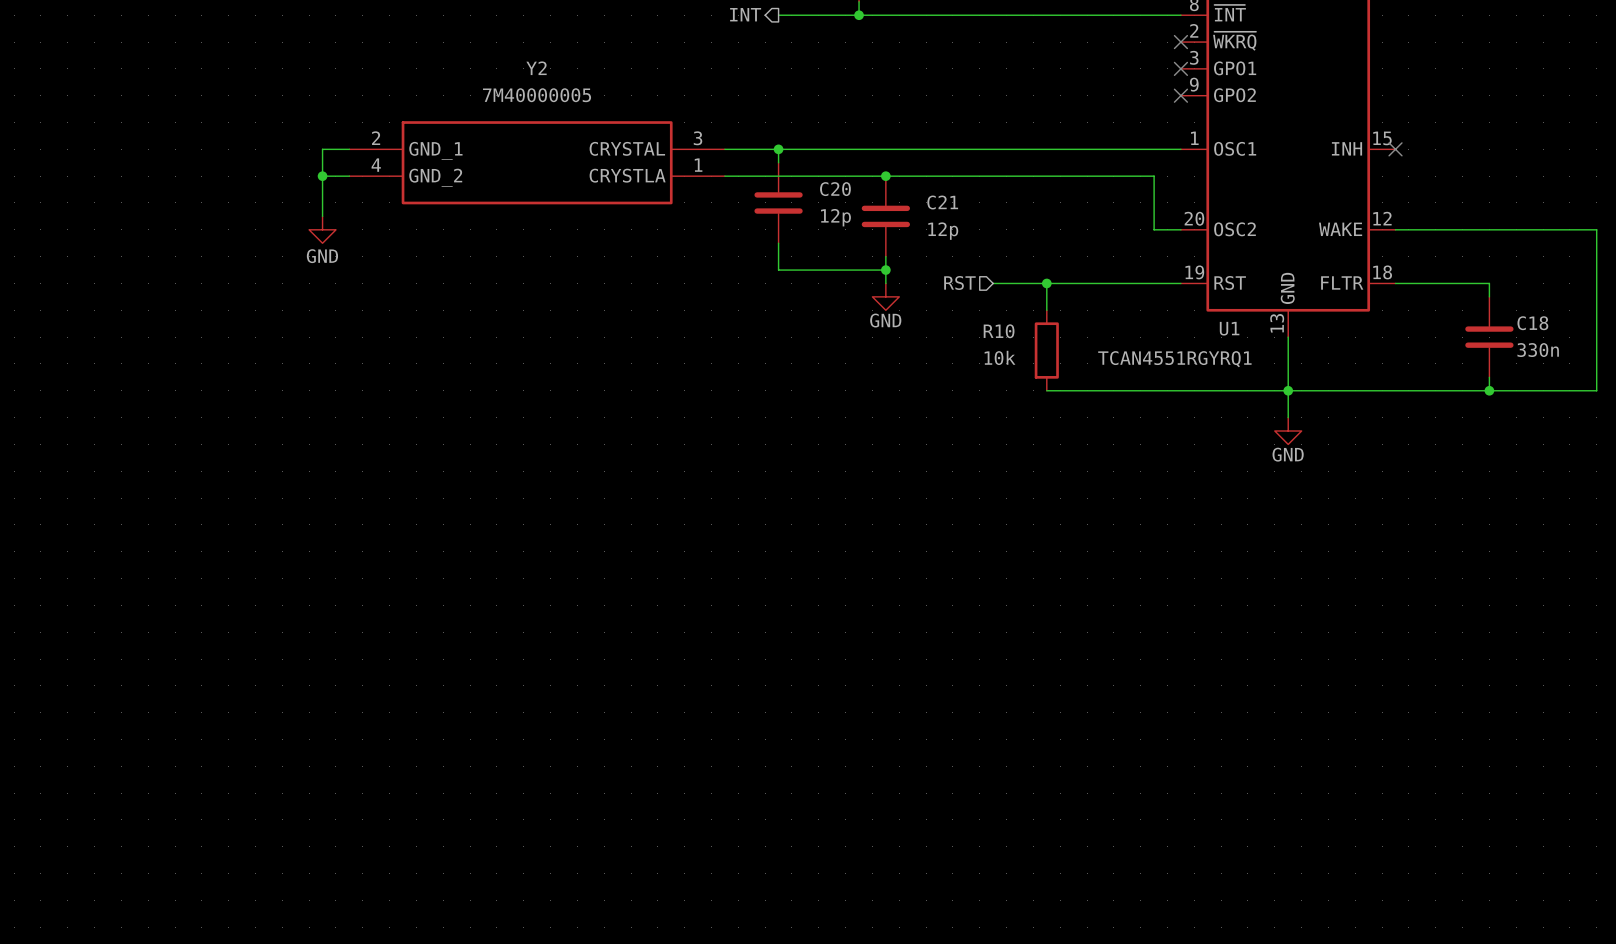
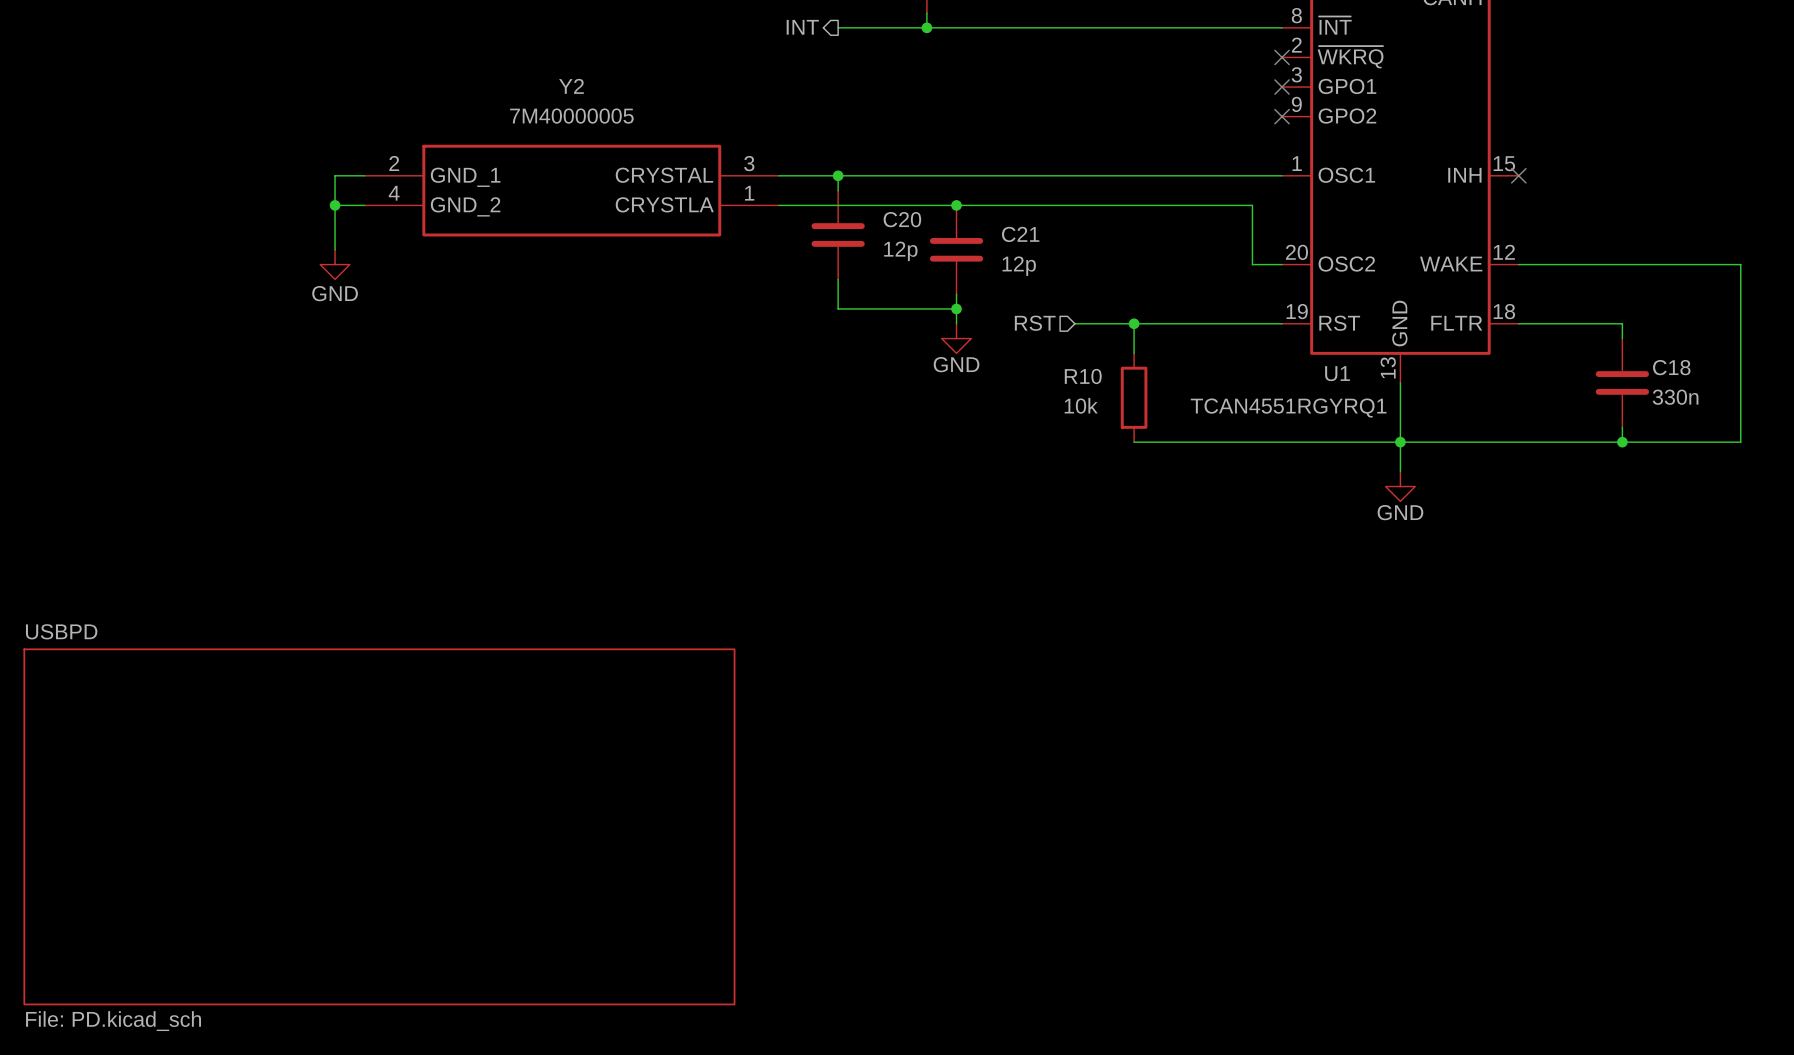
sheet USBPD: none -> File: PD.kicad_sch (379, 826)

